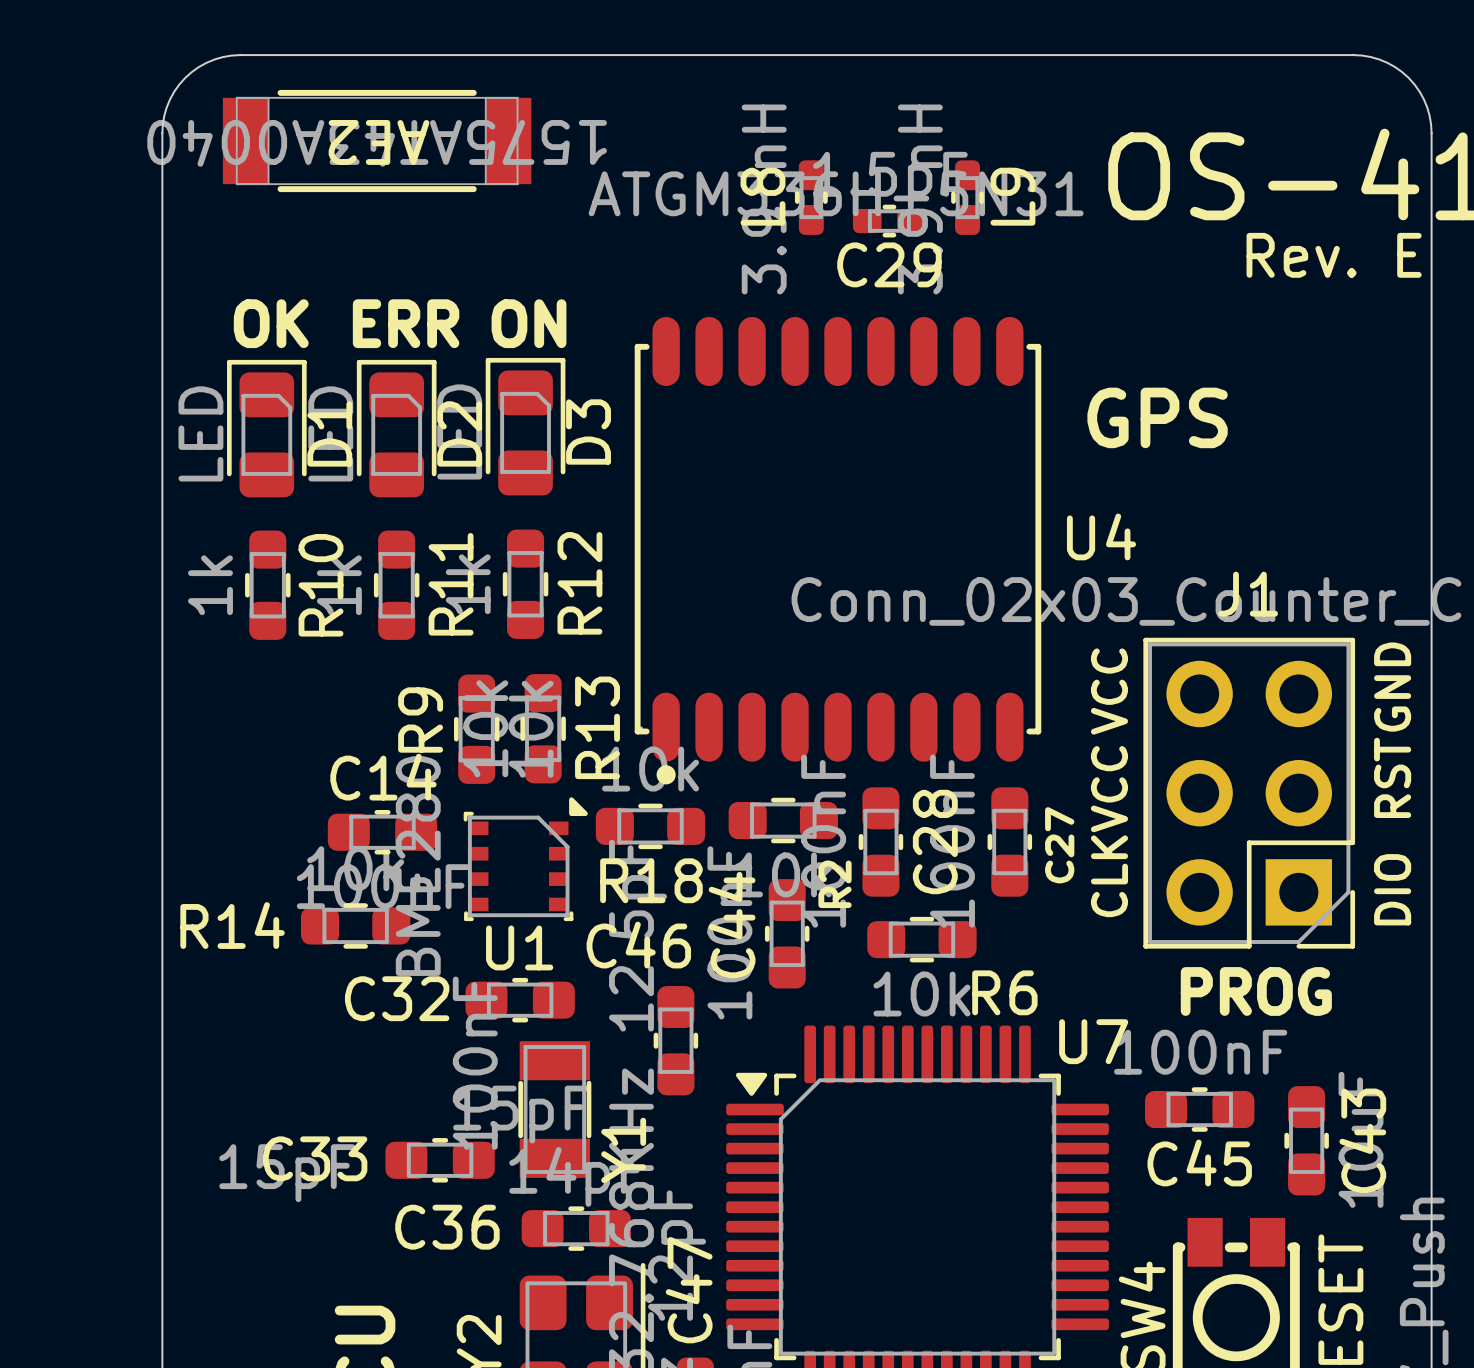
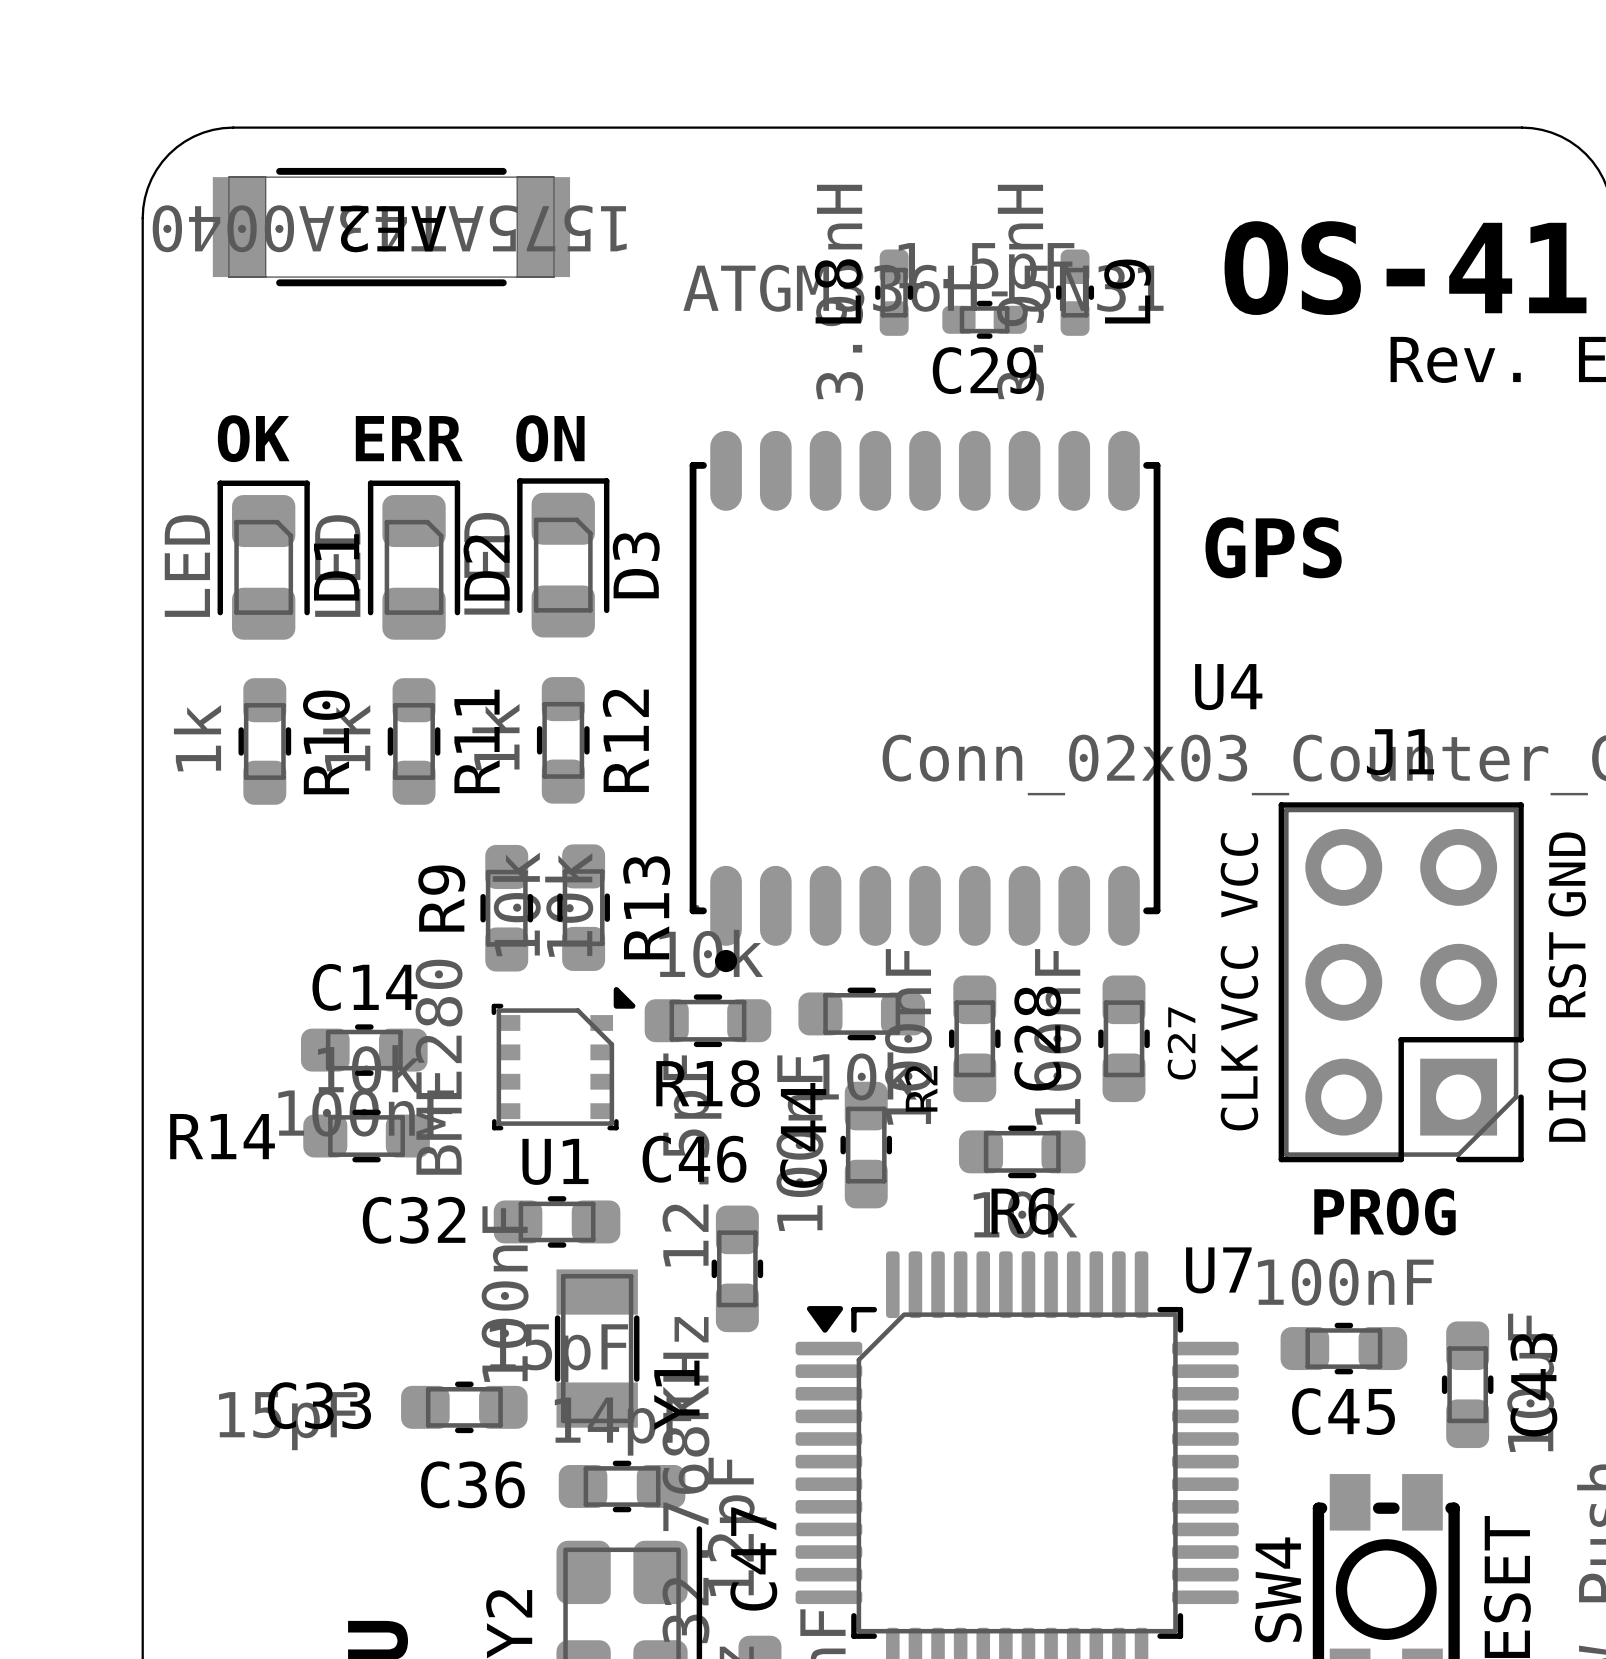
C14 position: (382, 832) -> (364, 1050)
R6 name position: R6 (1004, 992) -> R6 (1024, 1211)

